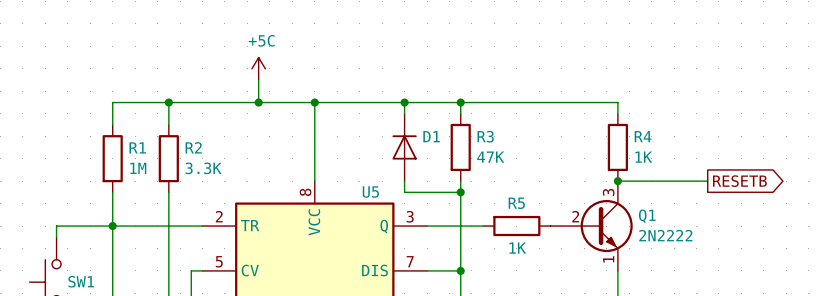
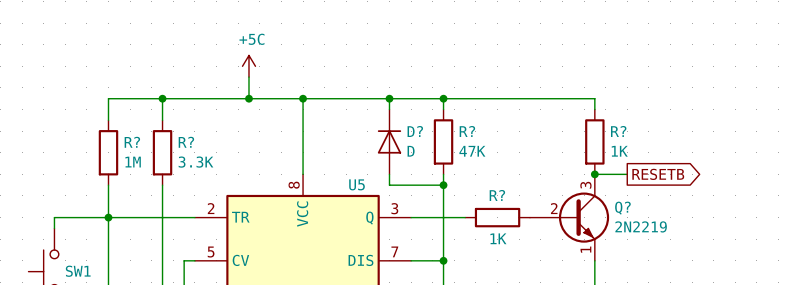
D1 name: D1 (431, 136) -> D? (415, 131)
R3 name: R3 (485, 136) -> R? (467, 131)
R4 name: R4 (643, 136) -> R? (618, 131)
R1 name: R1 (137, 147) -> R? (132, 142)
R2 name: R2 (193, 147) -> R? (186, 142)
D1 value: none -> D (411, 151)
wire: (651, 181) (707, 181) -> none
global label position: RESETB (739, 181) -> RESETB (658, 174)
R5 name: R5 (516, 203) -> R? (497, 195)
Q1 name: Q1 (647, 216) -> Q? (622, 208)
Q1 value: 2N2222 (665, 235) -> 2N2219 (641, 226)

